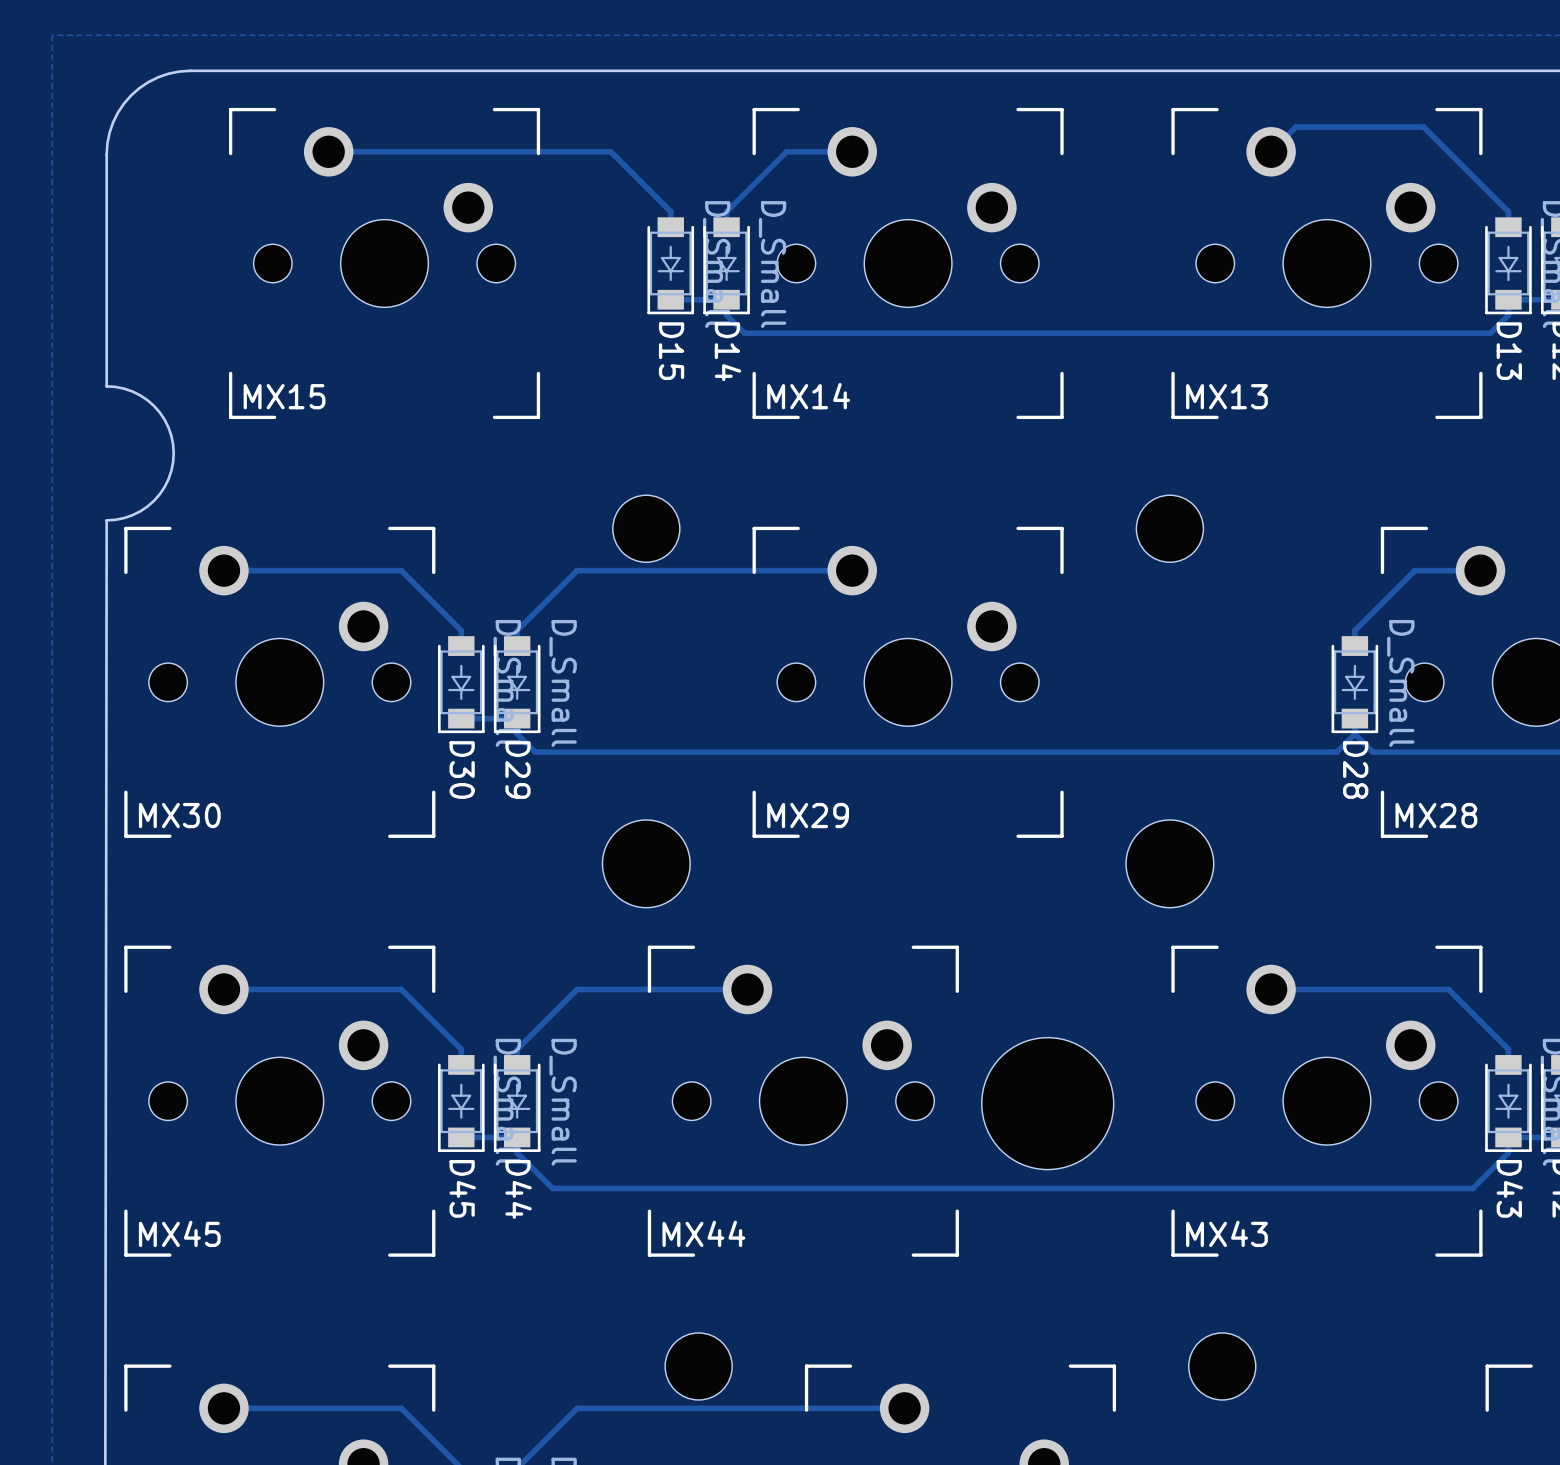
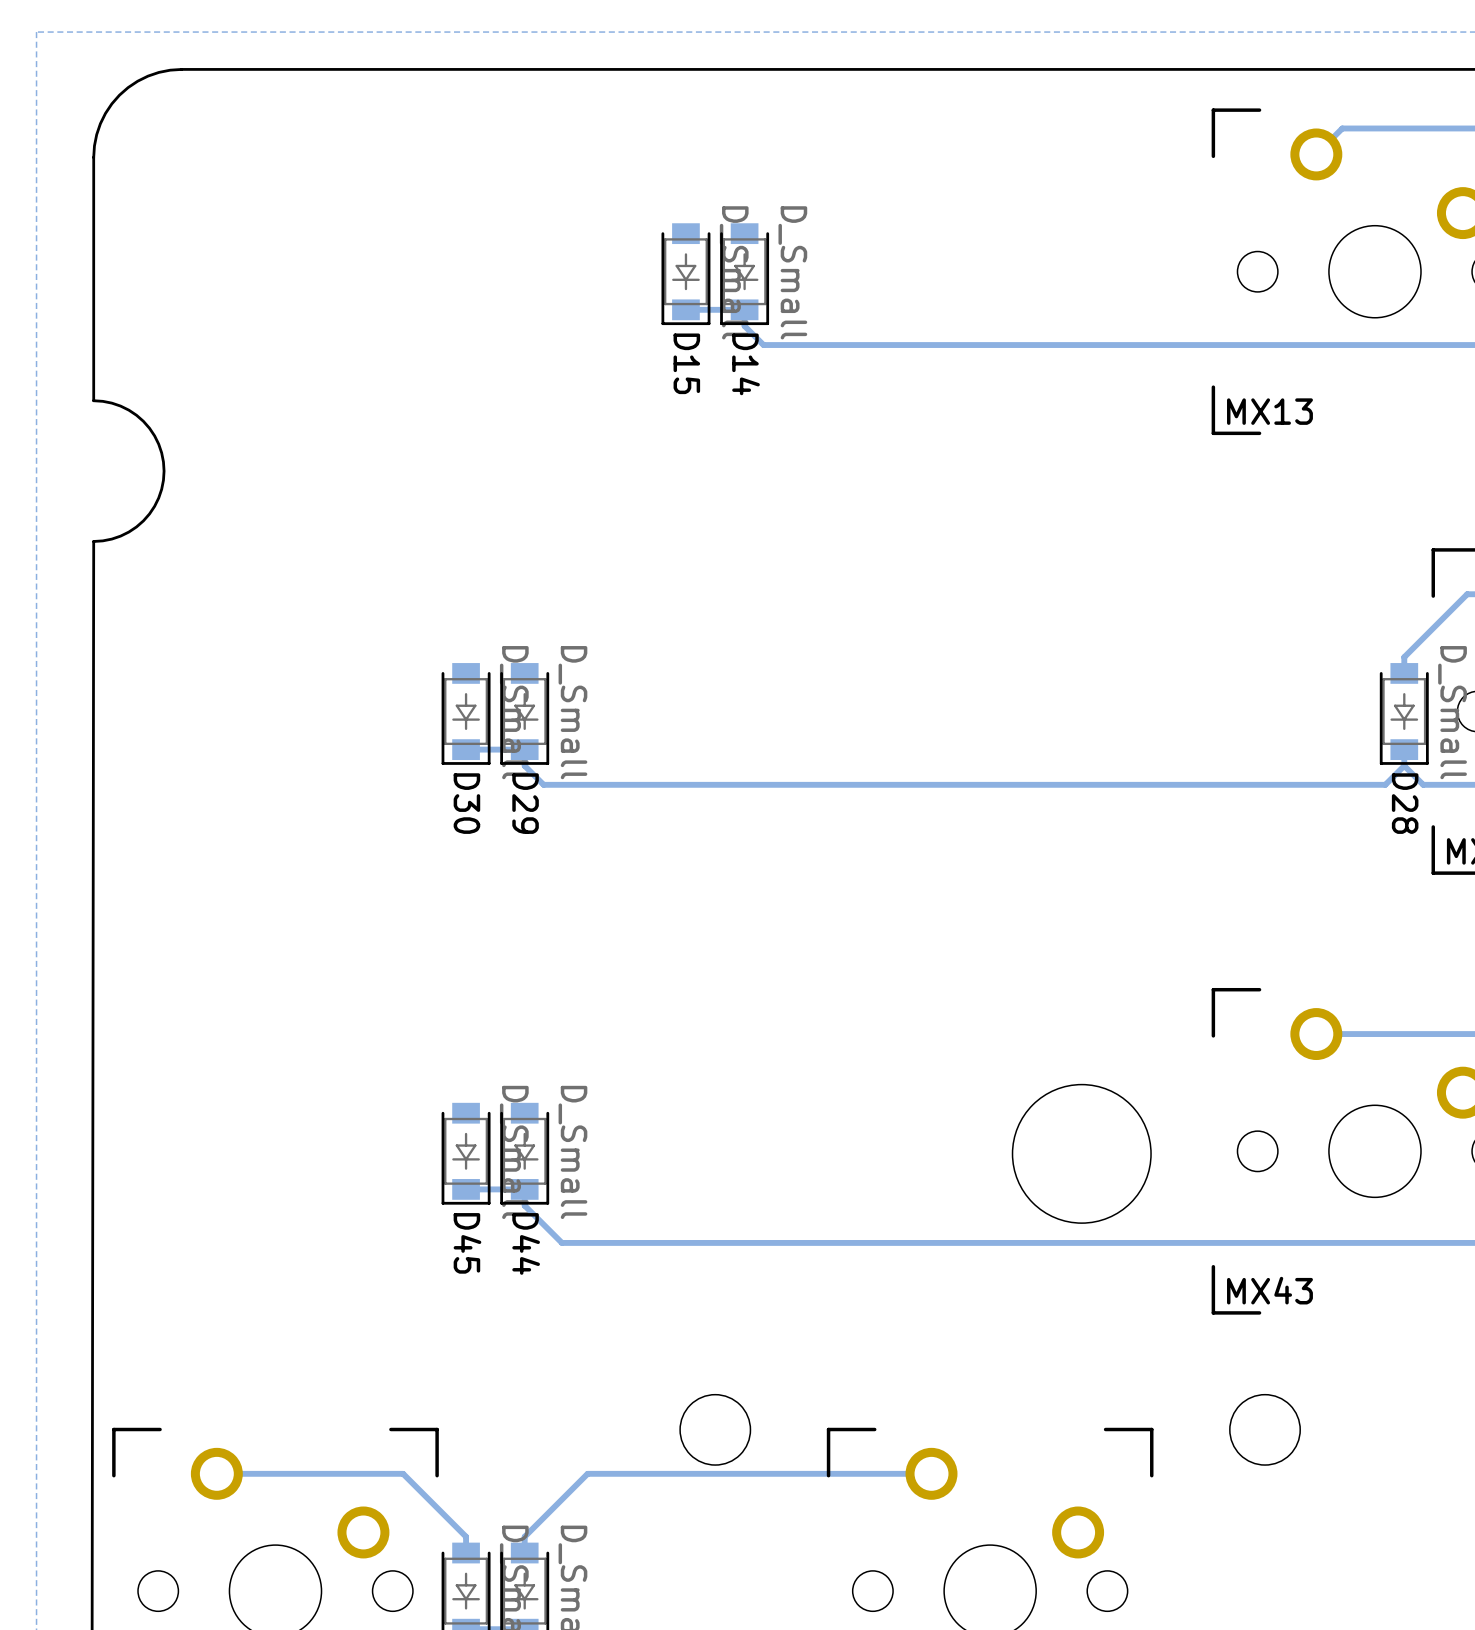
track: (328, 151) (610, 151) (670, 211) (670, 227) -> none
track: (852, 151) (786, 151) (726, 211) (726, 227) -> none
MX15: (384, 263) -> none
MX14: (908, 263) -> none
track: (223, 570) (401, 570) (461, 630) (461, 646) -> none
track: (852, 570) (577, 570) (517, 630) (517, 646) -> none
MX30: (279, 682) -> none
MX29: (908, 701) -> none
track: (223, 989) (401, 989) (461, 1049) (461, 1064) -> none
track: (747, 989) (577, 989) (517, 1049) (517, 1064) -> none
MX45: (279, 1101) -> none
MX44: (803, 1101) -> none

